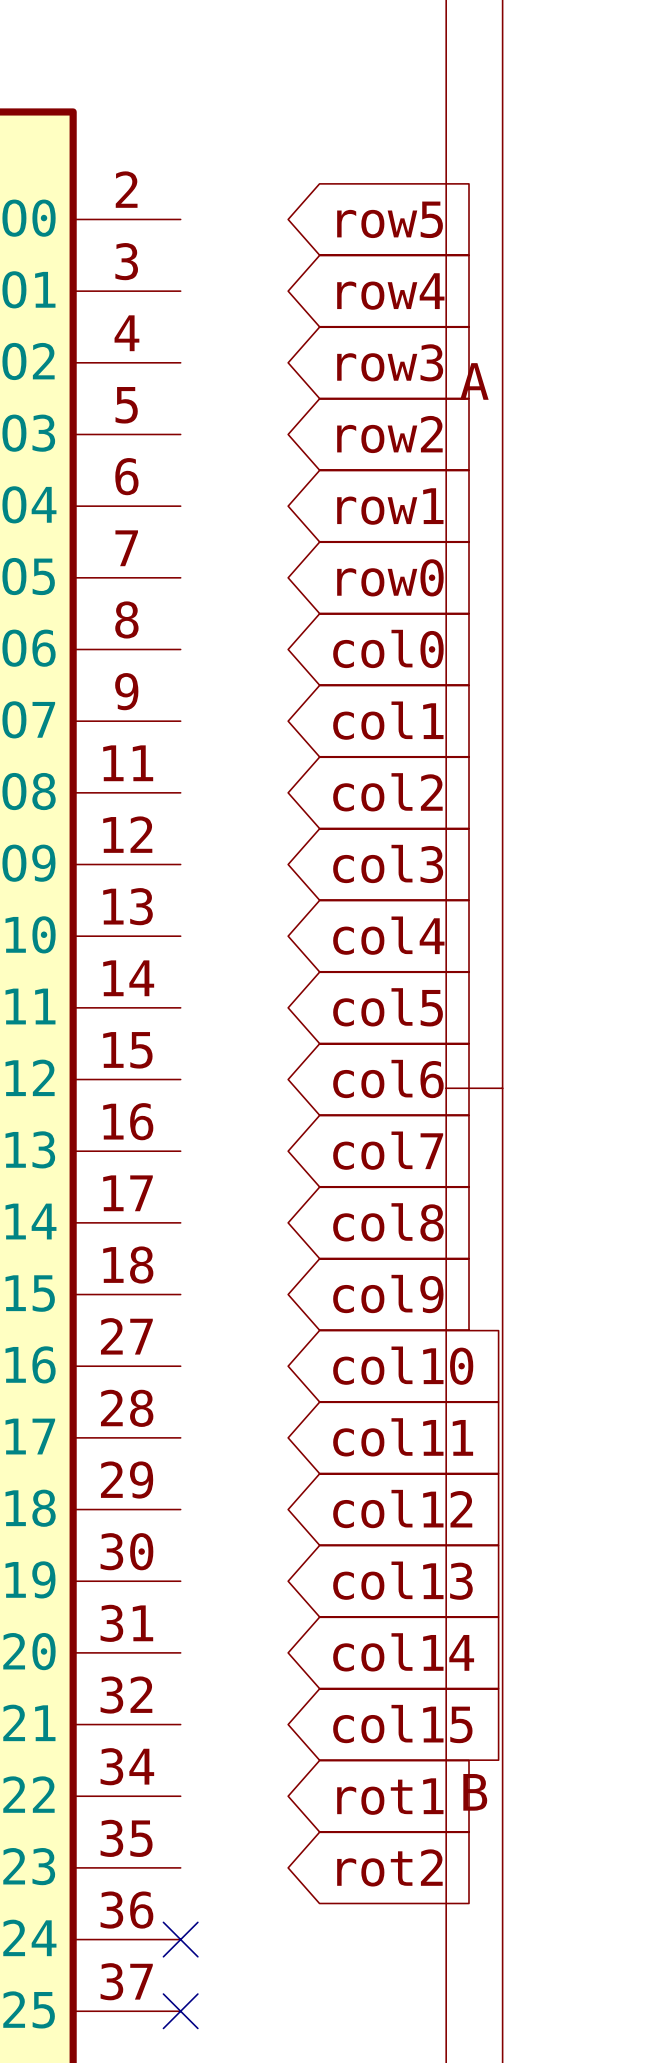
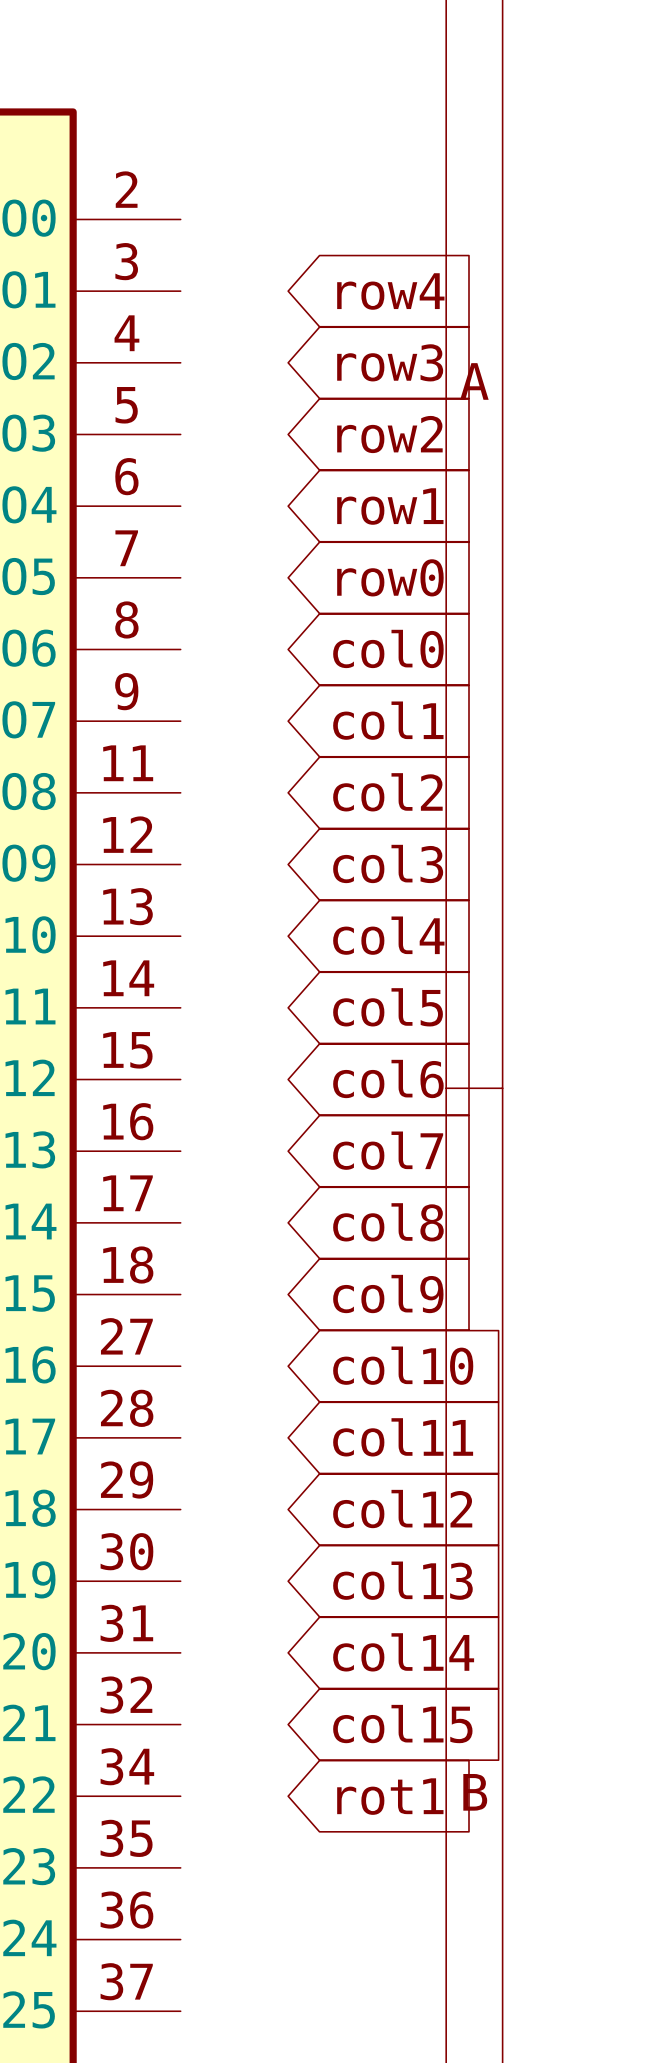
global label: row5 (390, 219) -> none
global label: rot2 (389, 1867) -> none
no-connect mark: (180, 1939) -> none
no-connect mark: (180, 2011) -> none

